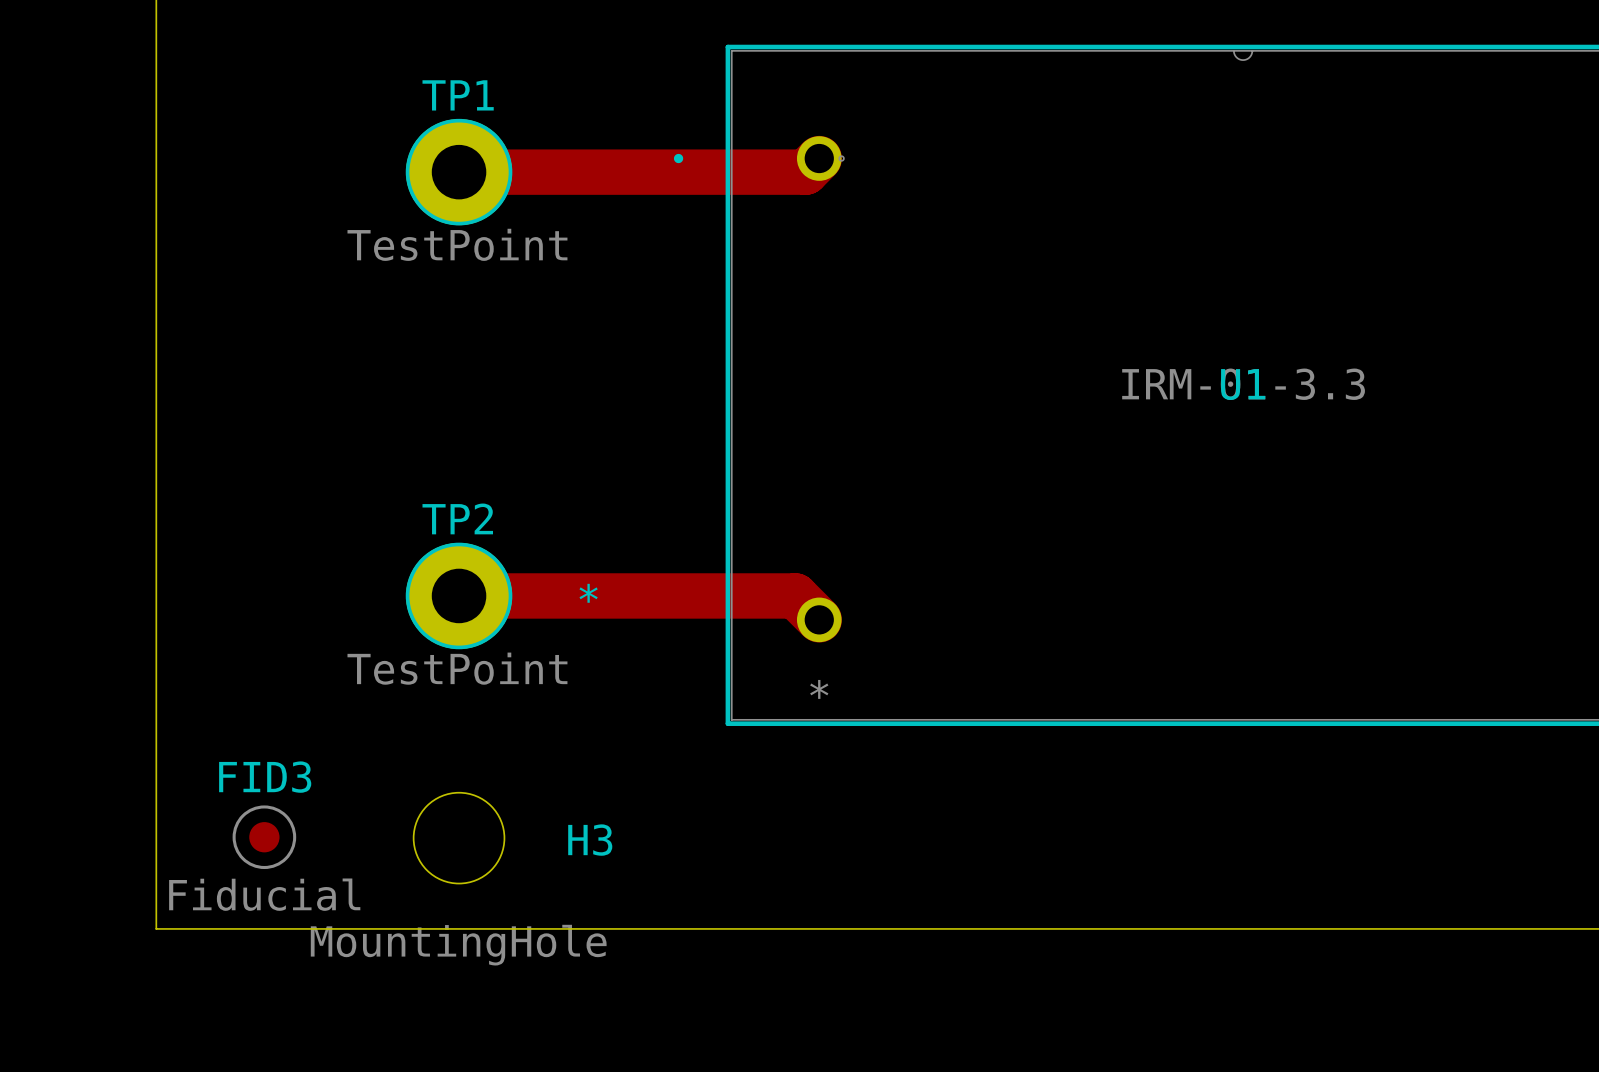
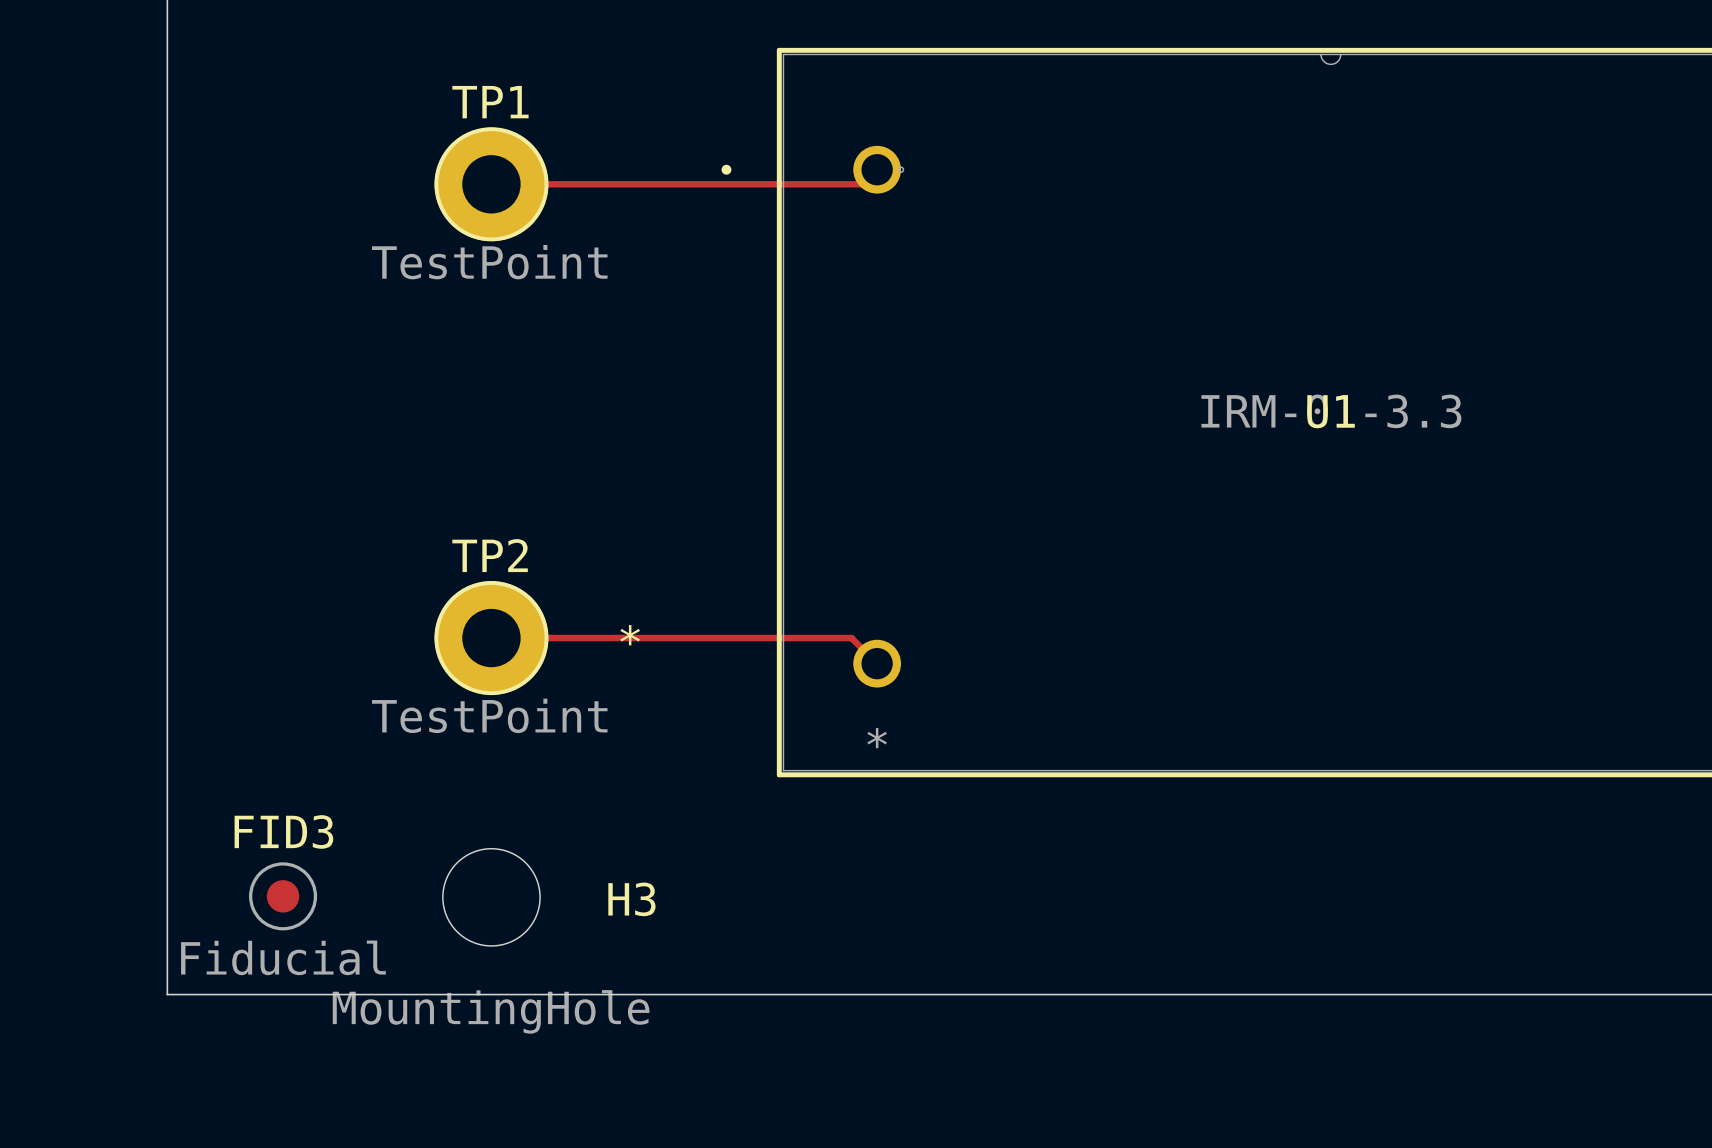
top track width: thick (819, 158) (805, 172) (459, 172) -> thin (877, 169) (862, 184) (491, 184)
top track width: thick (459, 595) (795, 595) (819, 619) -> thin (491, 638) (851, 638) (877, 663)

